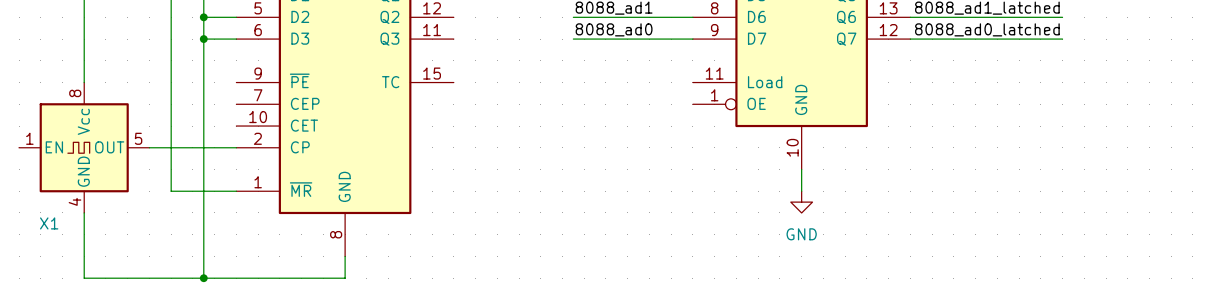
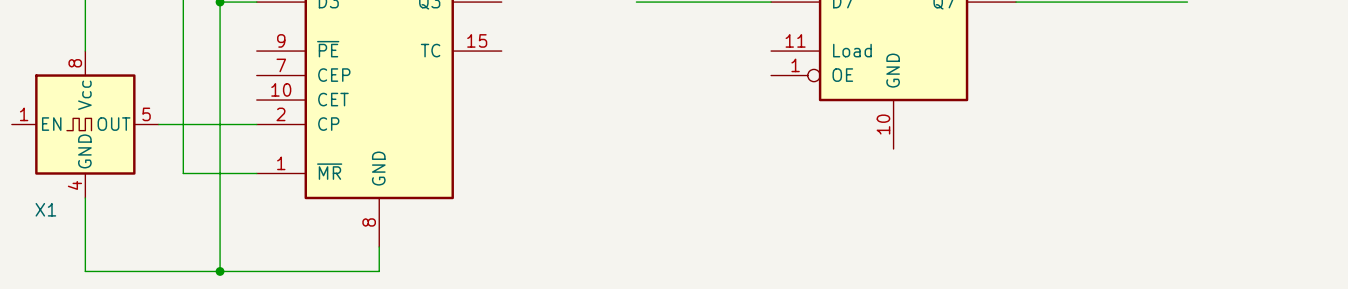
wire: (801, 169) (801, 191) -> none
power symbol: GND (801, 202) -> none

